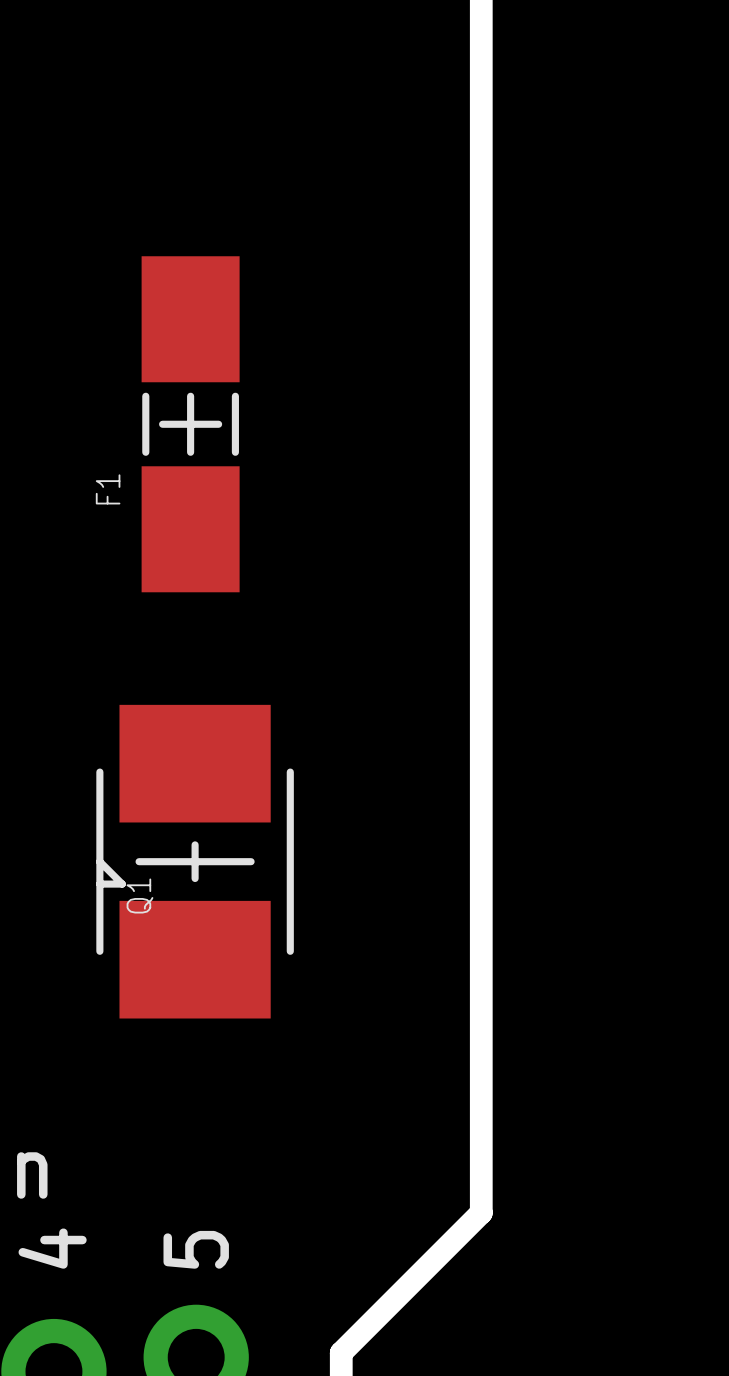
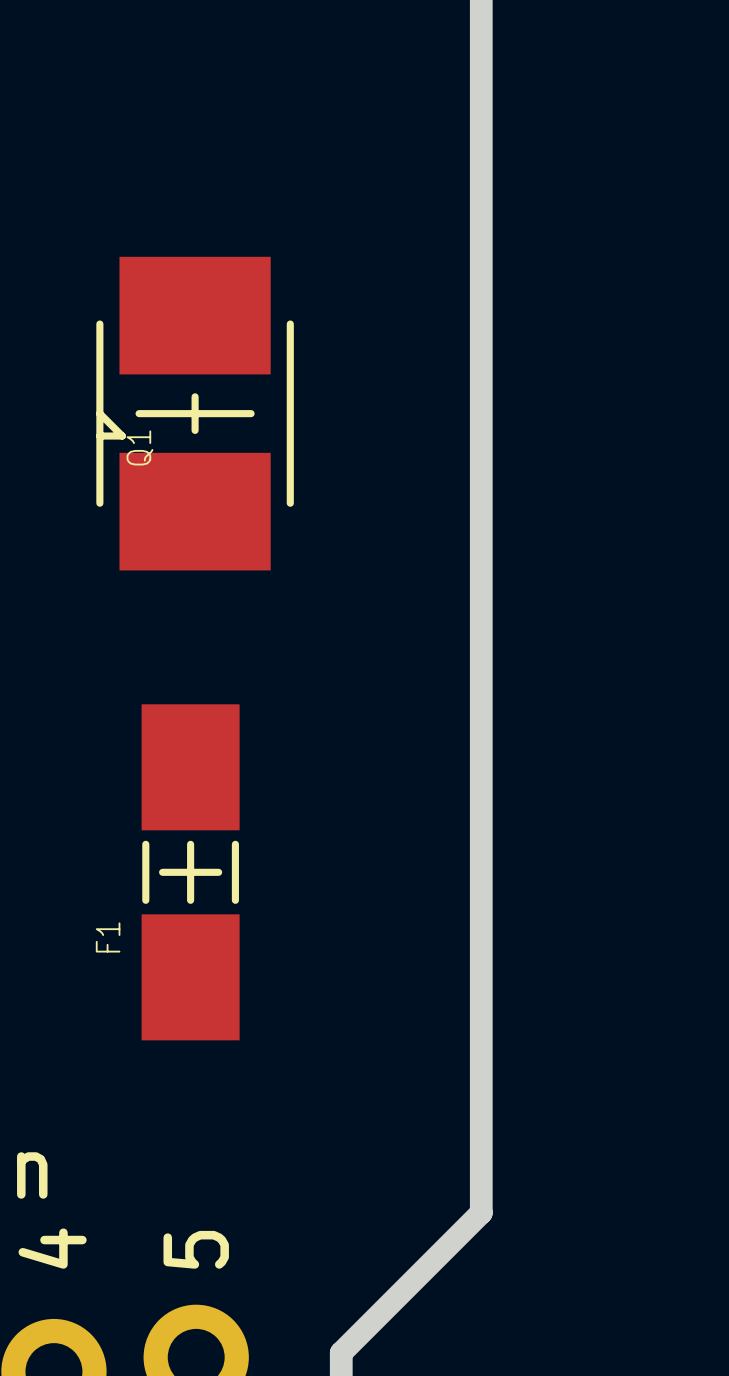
F1 position: (190, 424) -> (190, 872)
Q1 position: (195, 861) -> (195, 413)

